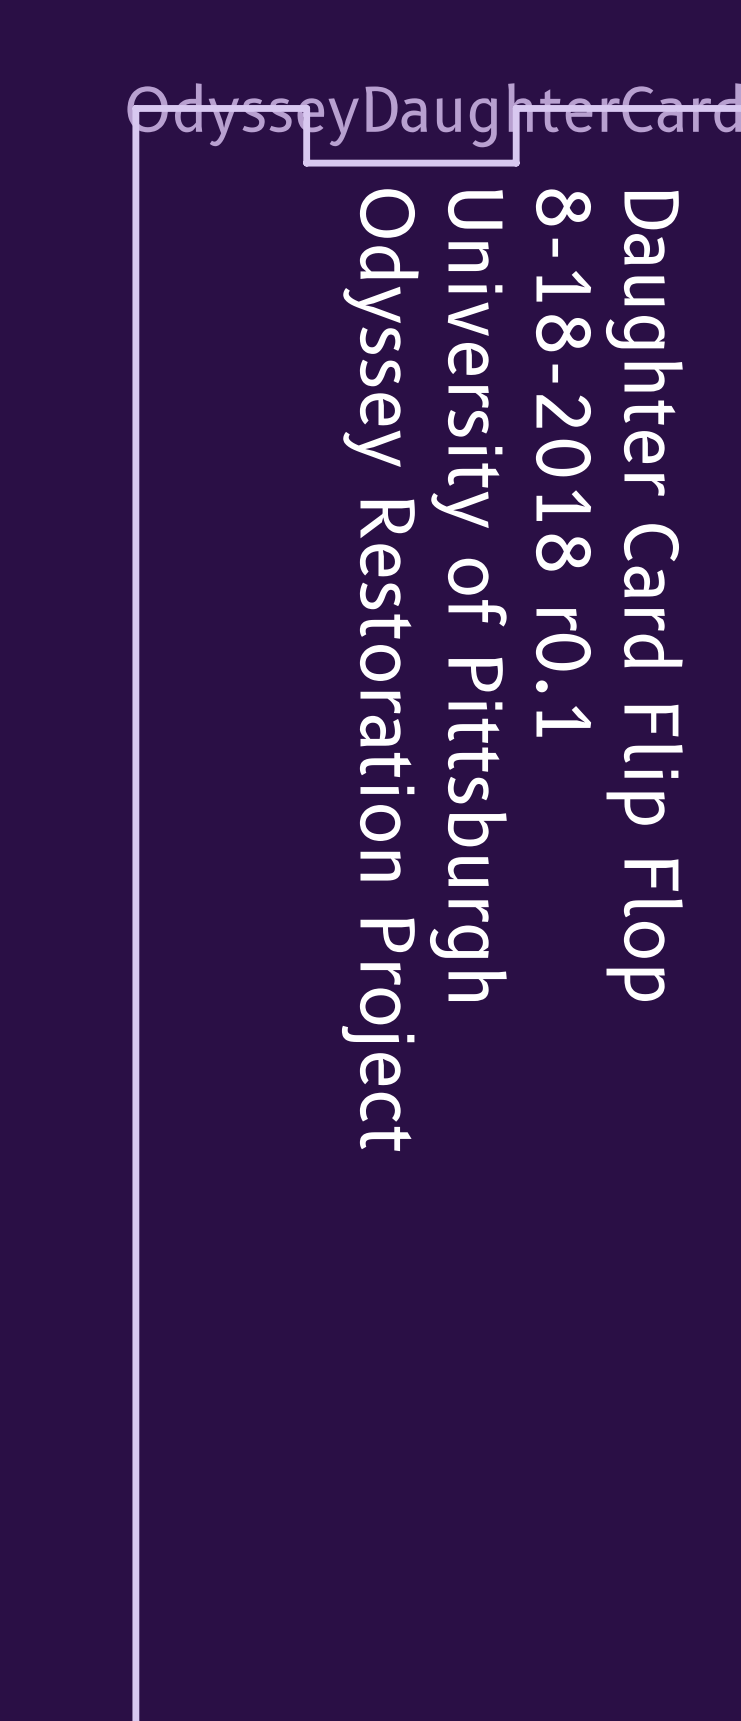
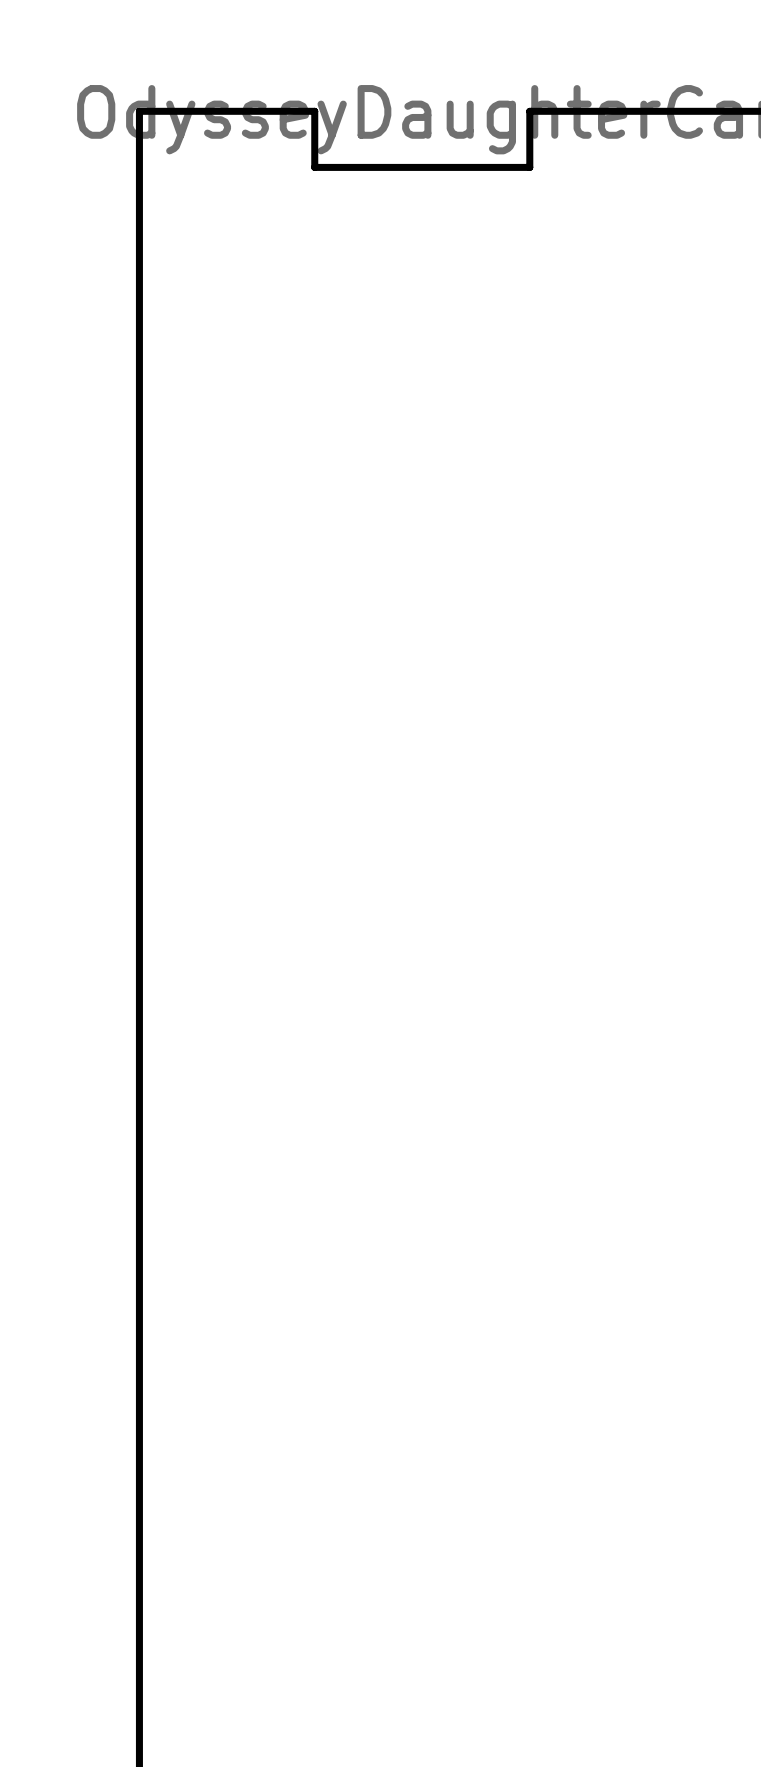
text: 8-18-2018 r0.1 (563, 463) -> none
text: University of Pittsburgh (468, 595) -> none
text: Daughter Card Flip Flop (644, 595) -> none
text: Odyssey Restoration Project (380, 670) -> none

